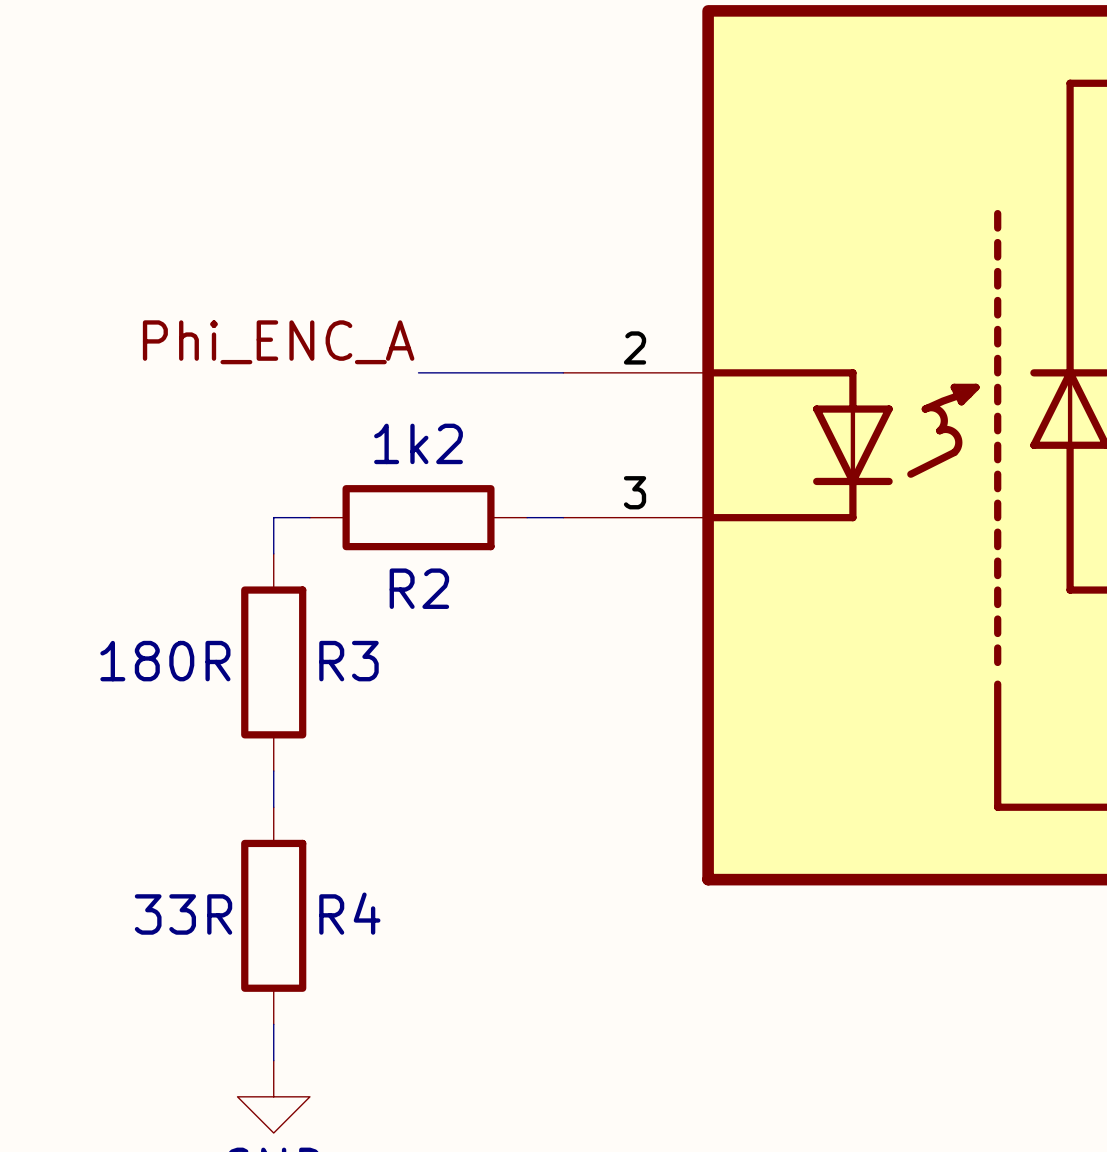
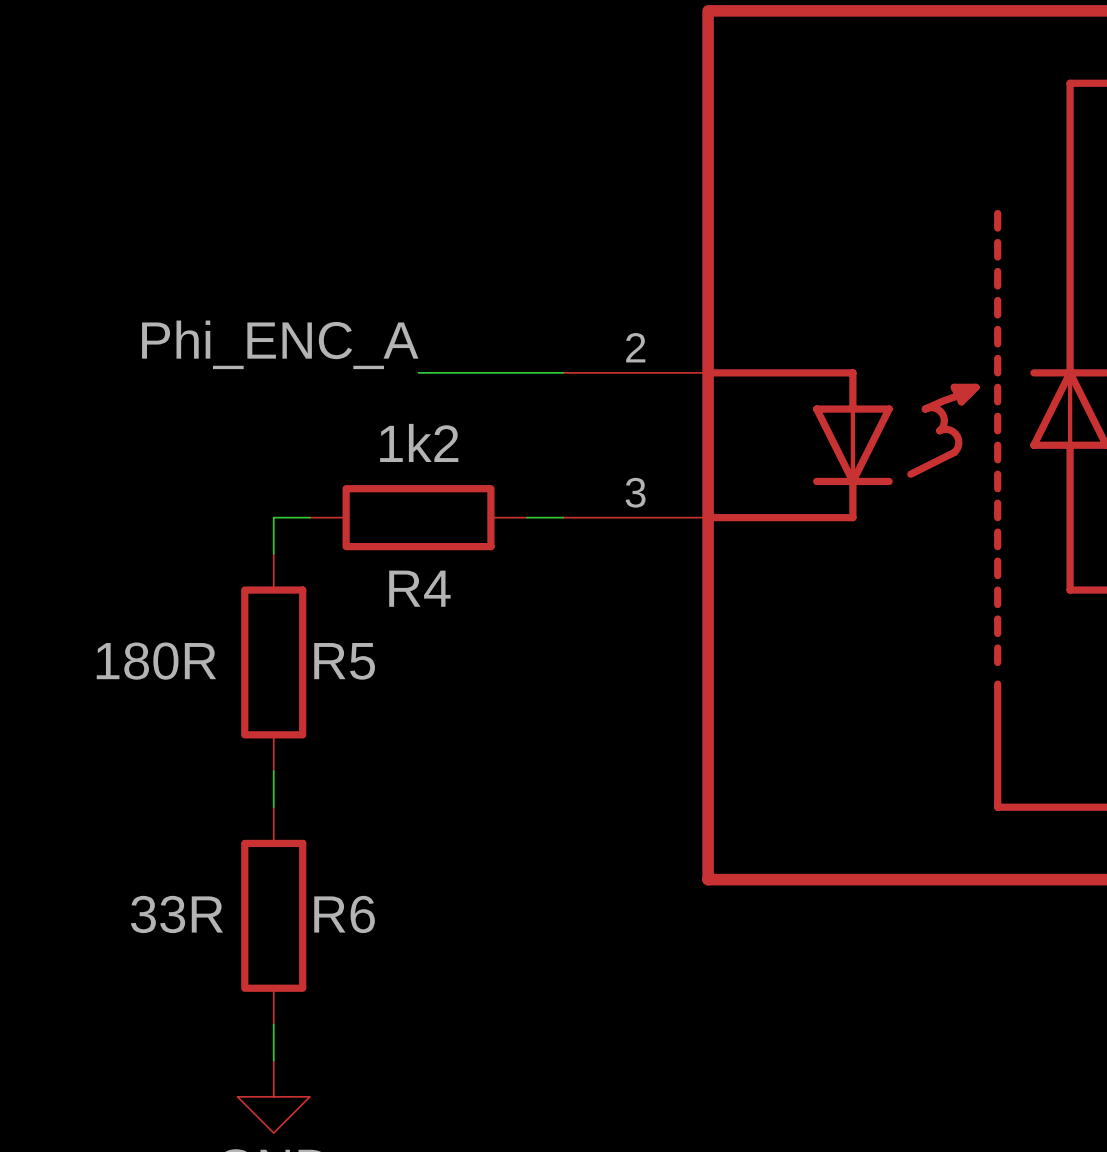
R2 name: R2 (419, 588) -> R4 (419, 588)
R3 name: R3 (348, 661) -> R5 (344, 661)
R4 name: R4 (349, 913) -> R6 (344, 914)

